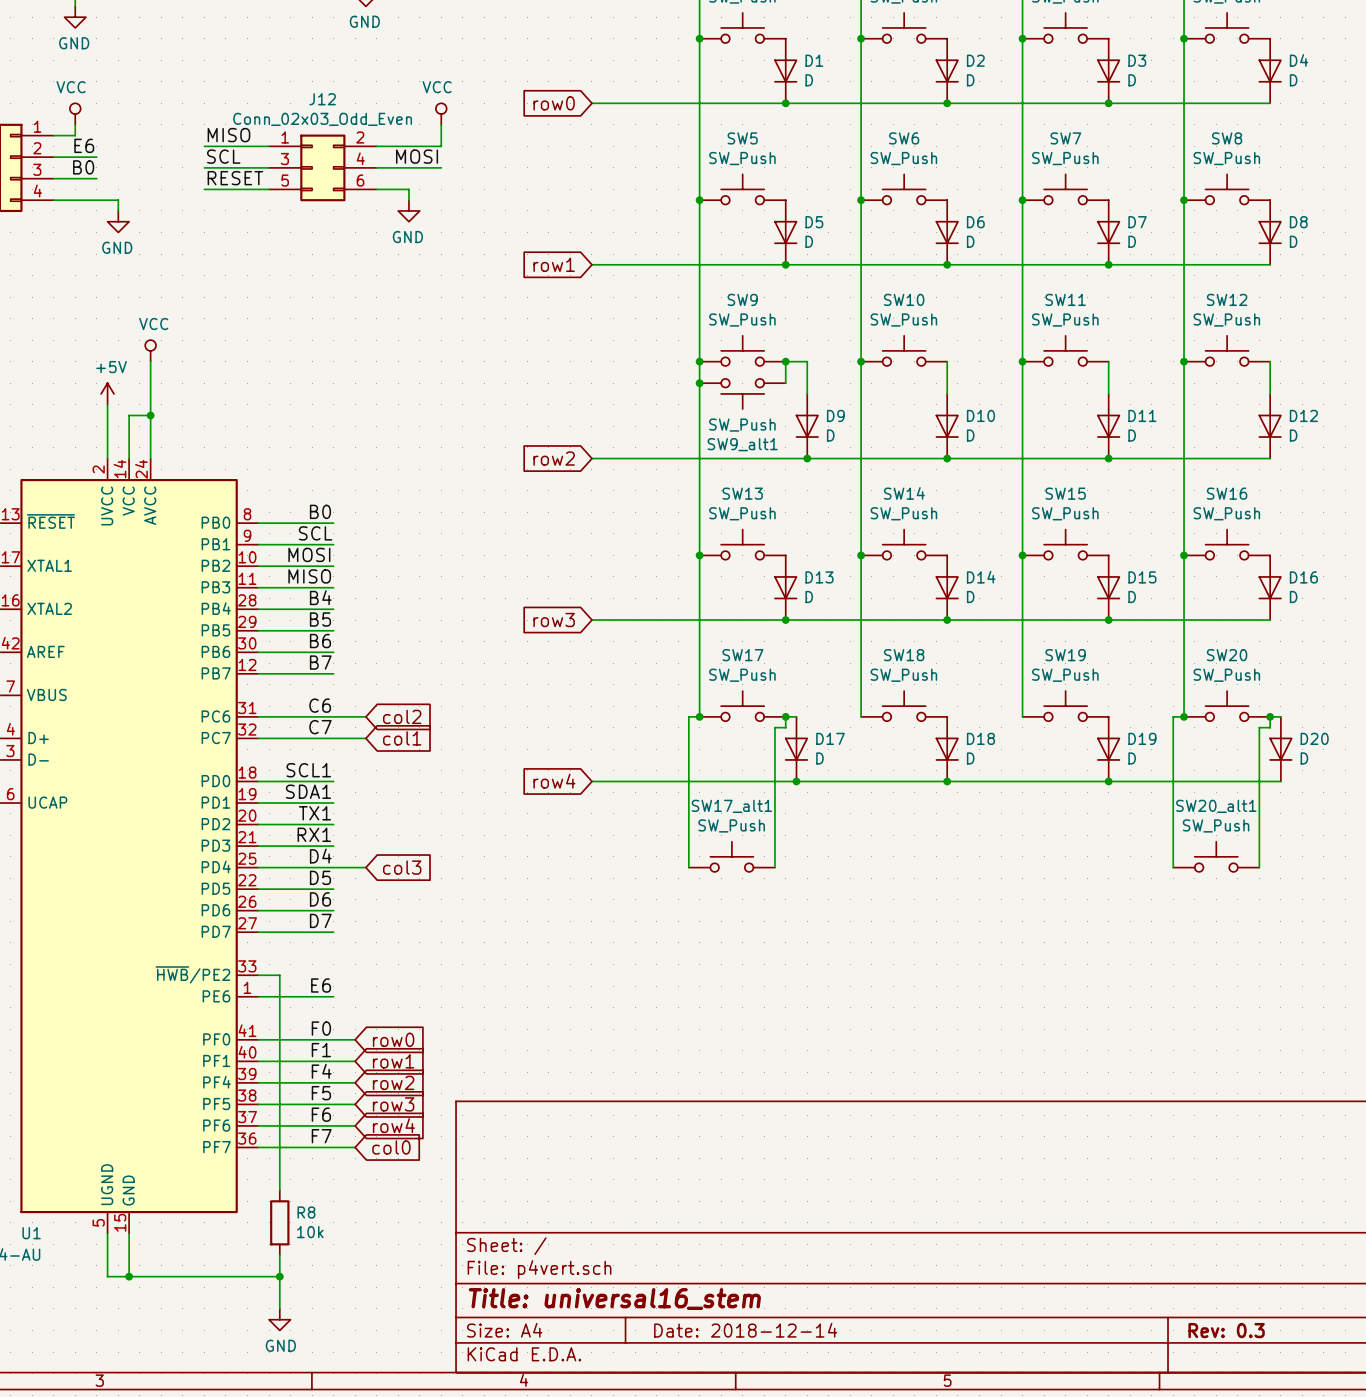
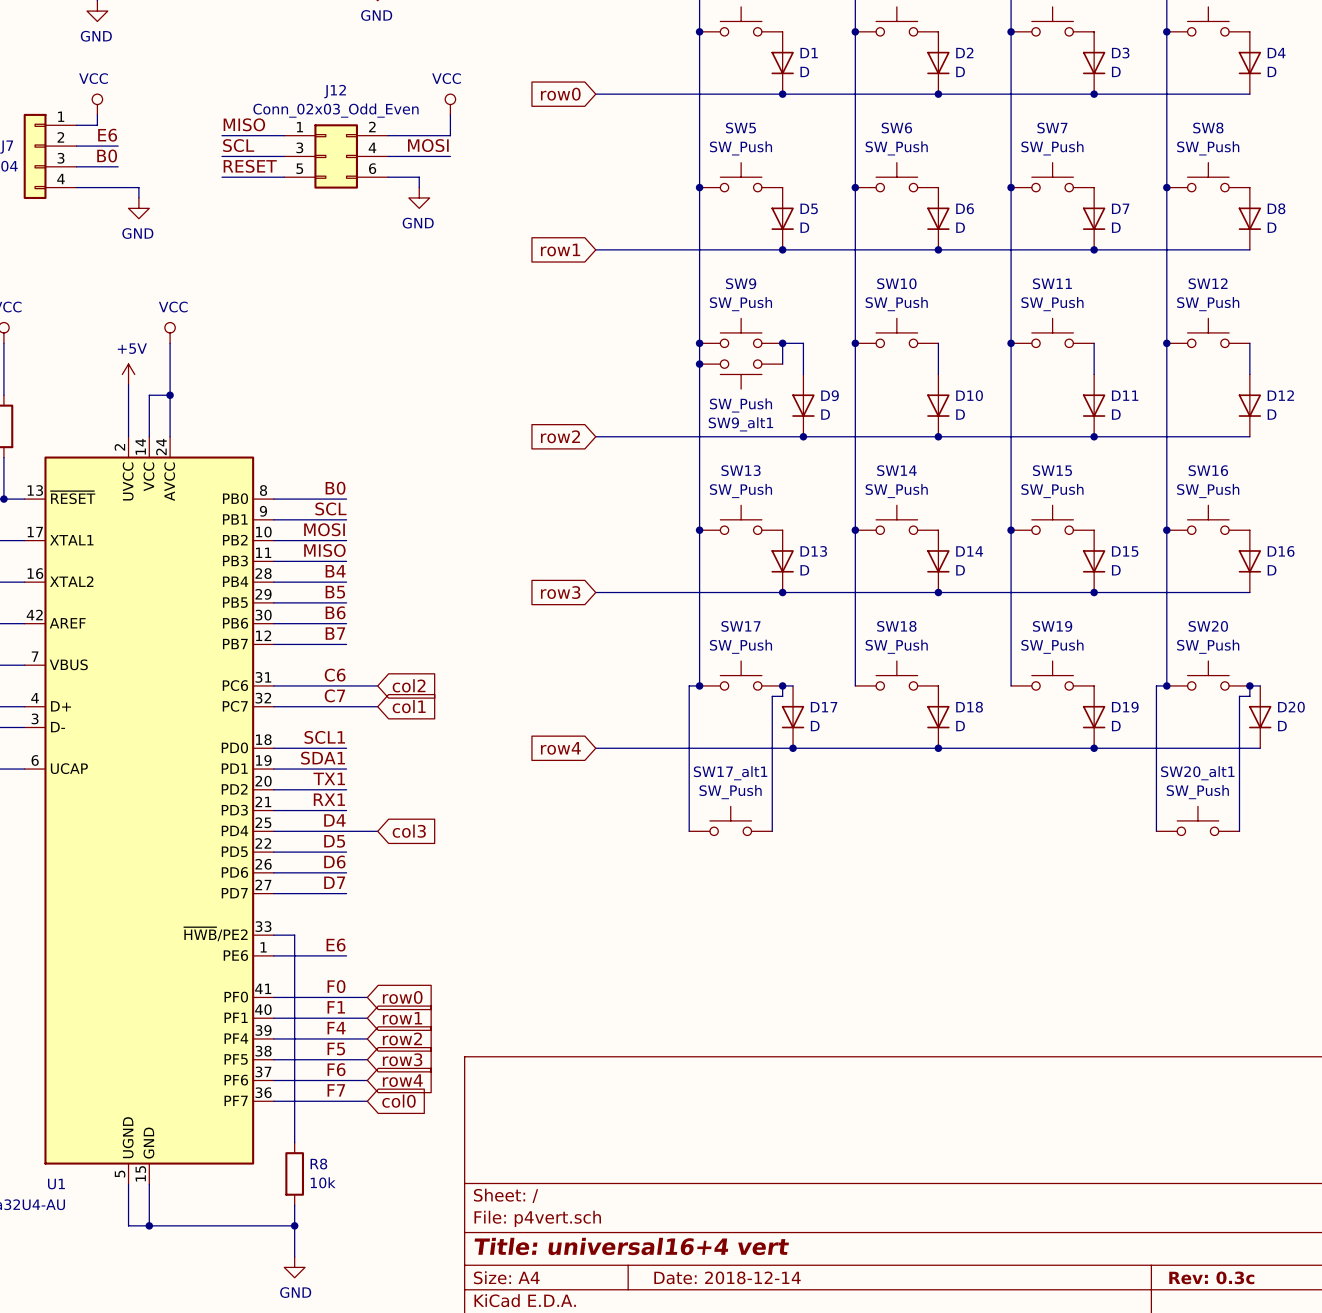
title block: Title: universal16_stem (614, 1299) -> Title: universal16+4 vert (631, 1246)
title block: Rev: 0.3 (1226, 1330) -> Rev: 0.3c (1211, 1277)

